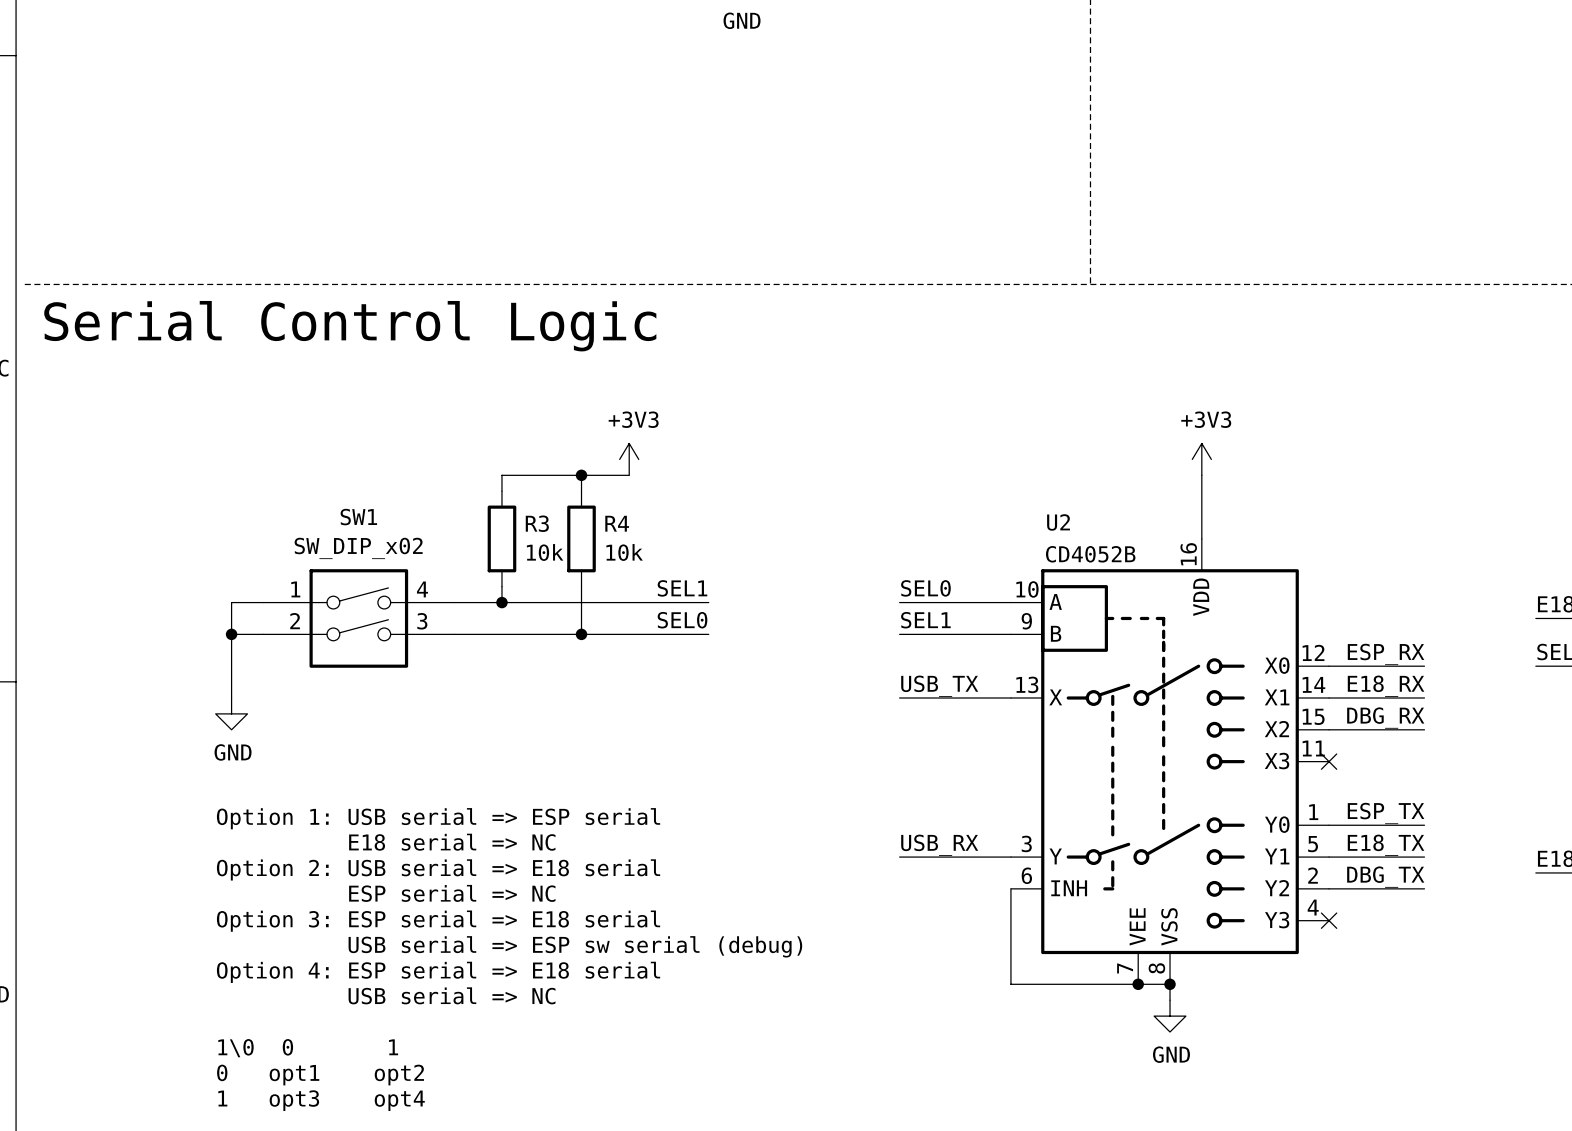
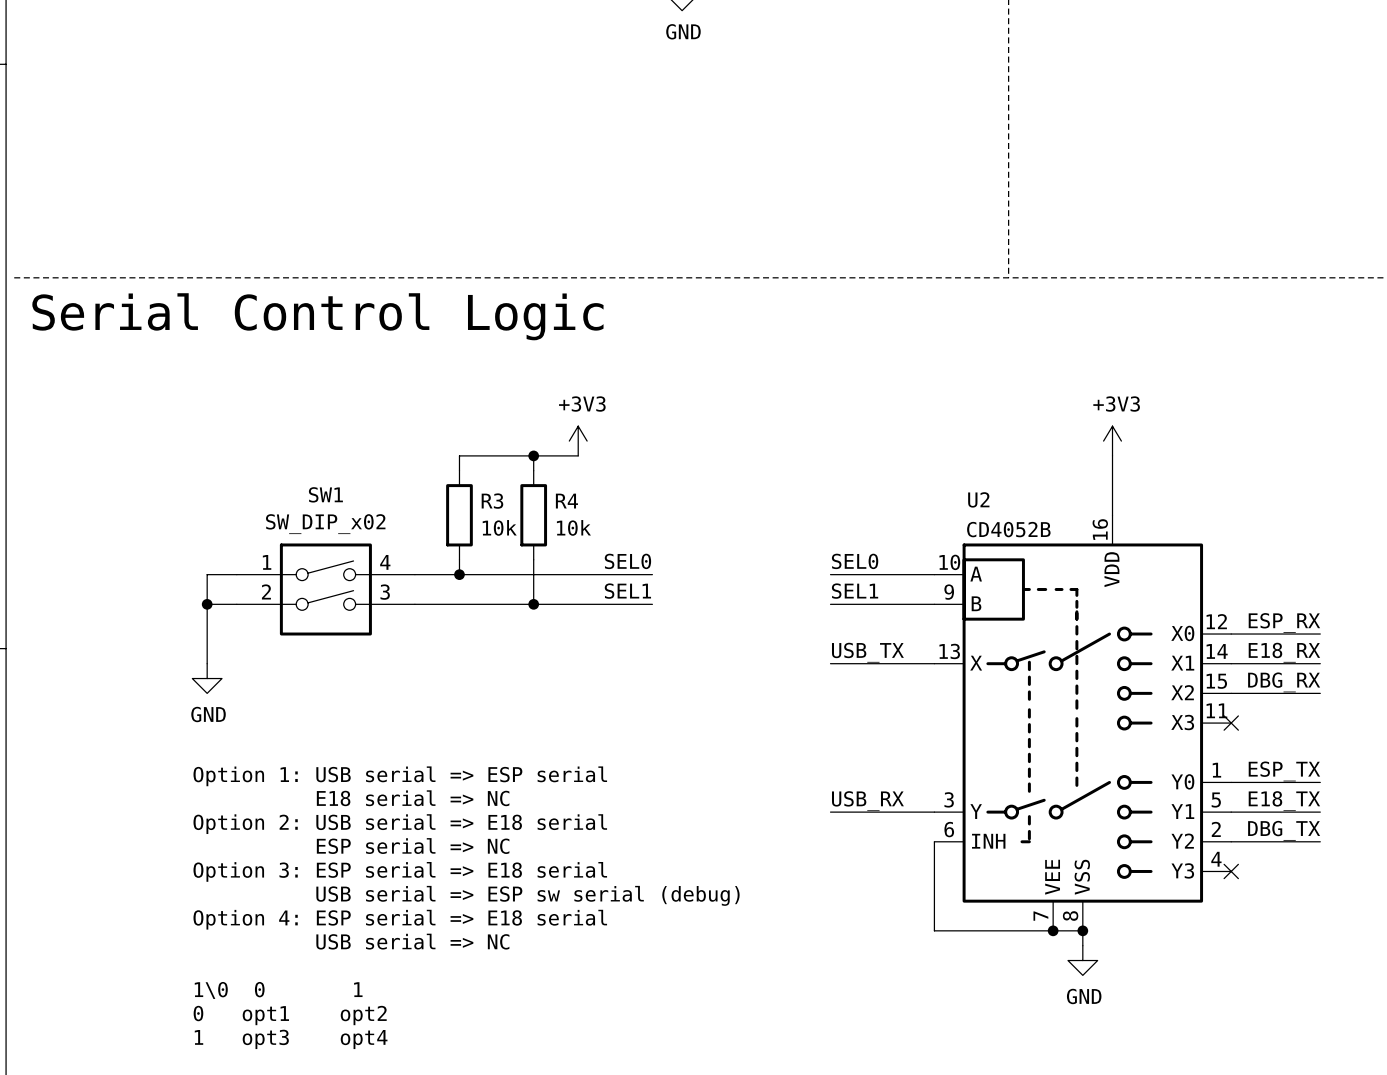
label: SEL1 (682, 588) -> SEL0 (627, 561)
label: SEL0 (682, 620) -> SEL1 (627, 591)

